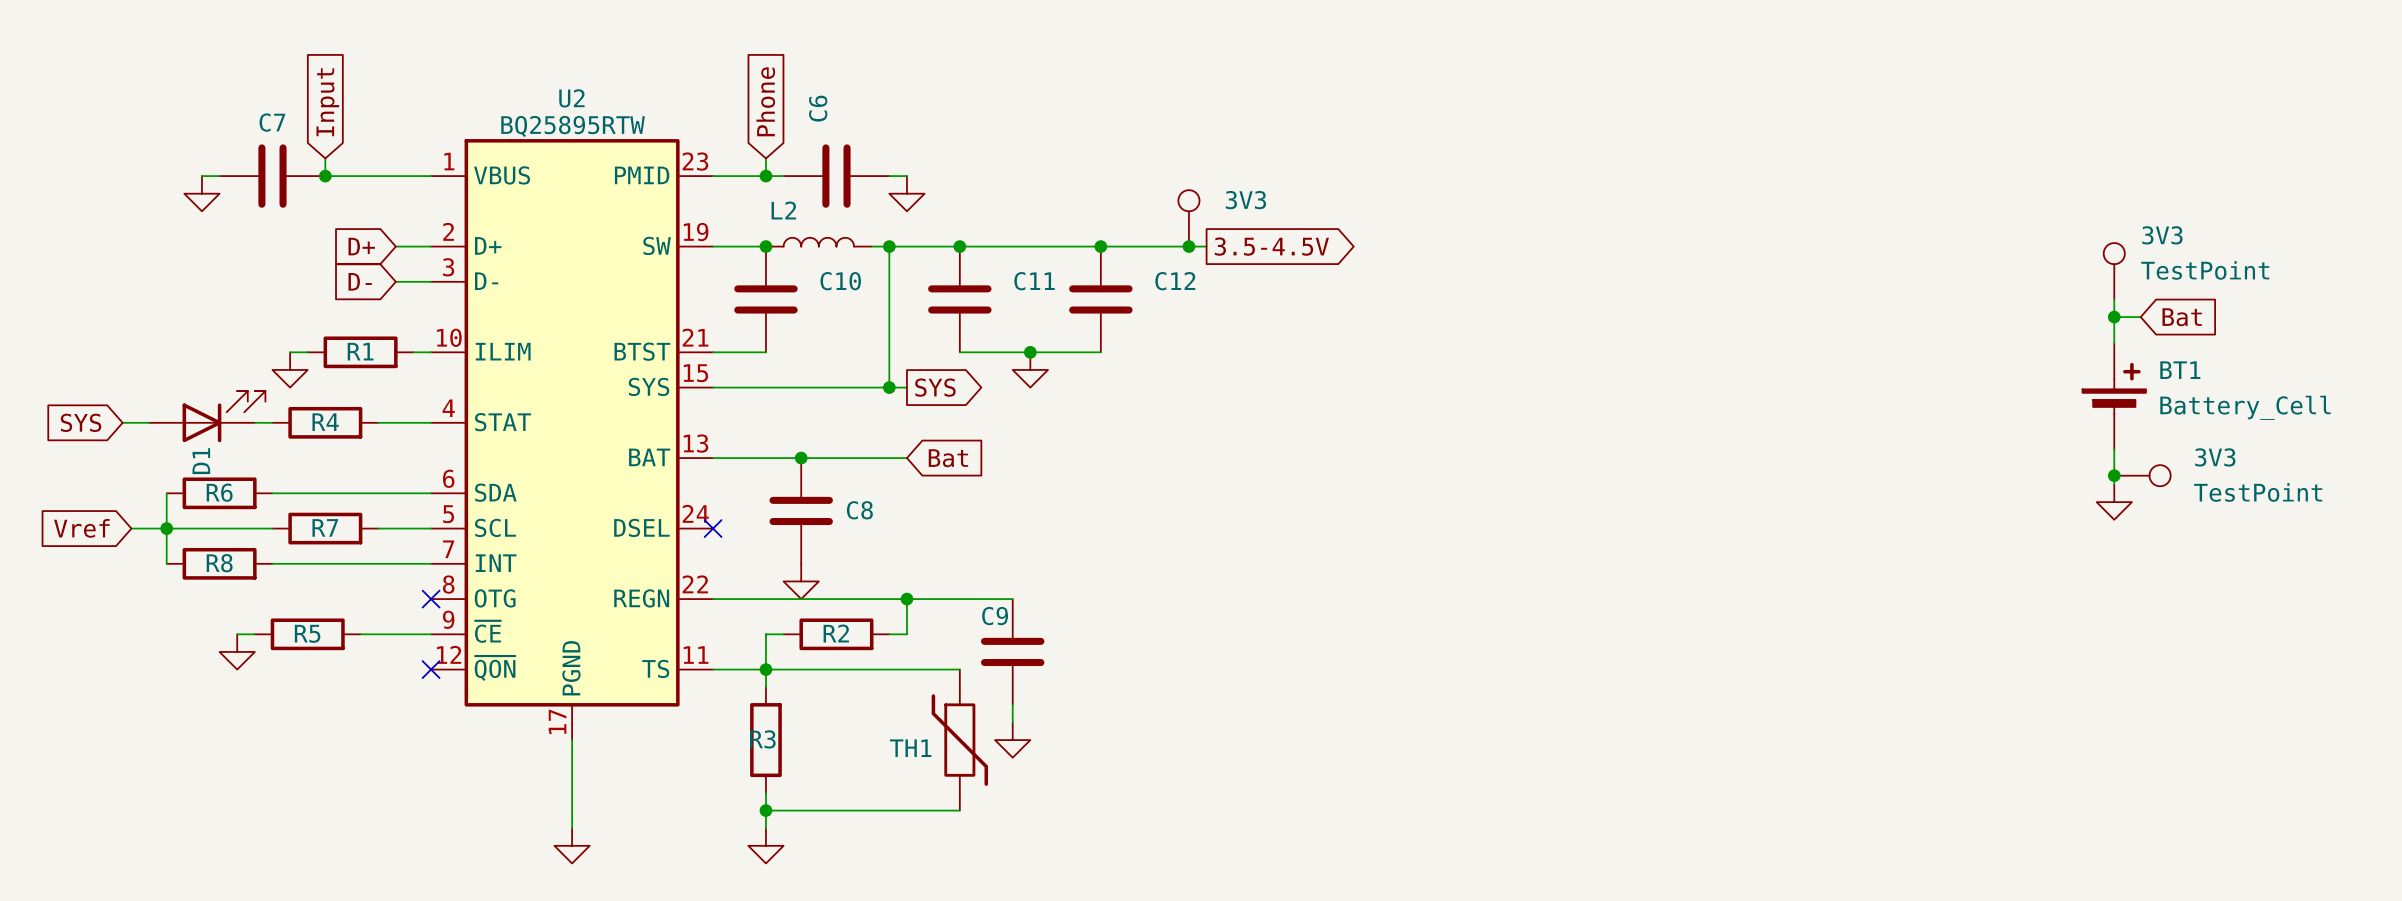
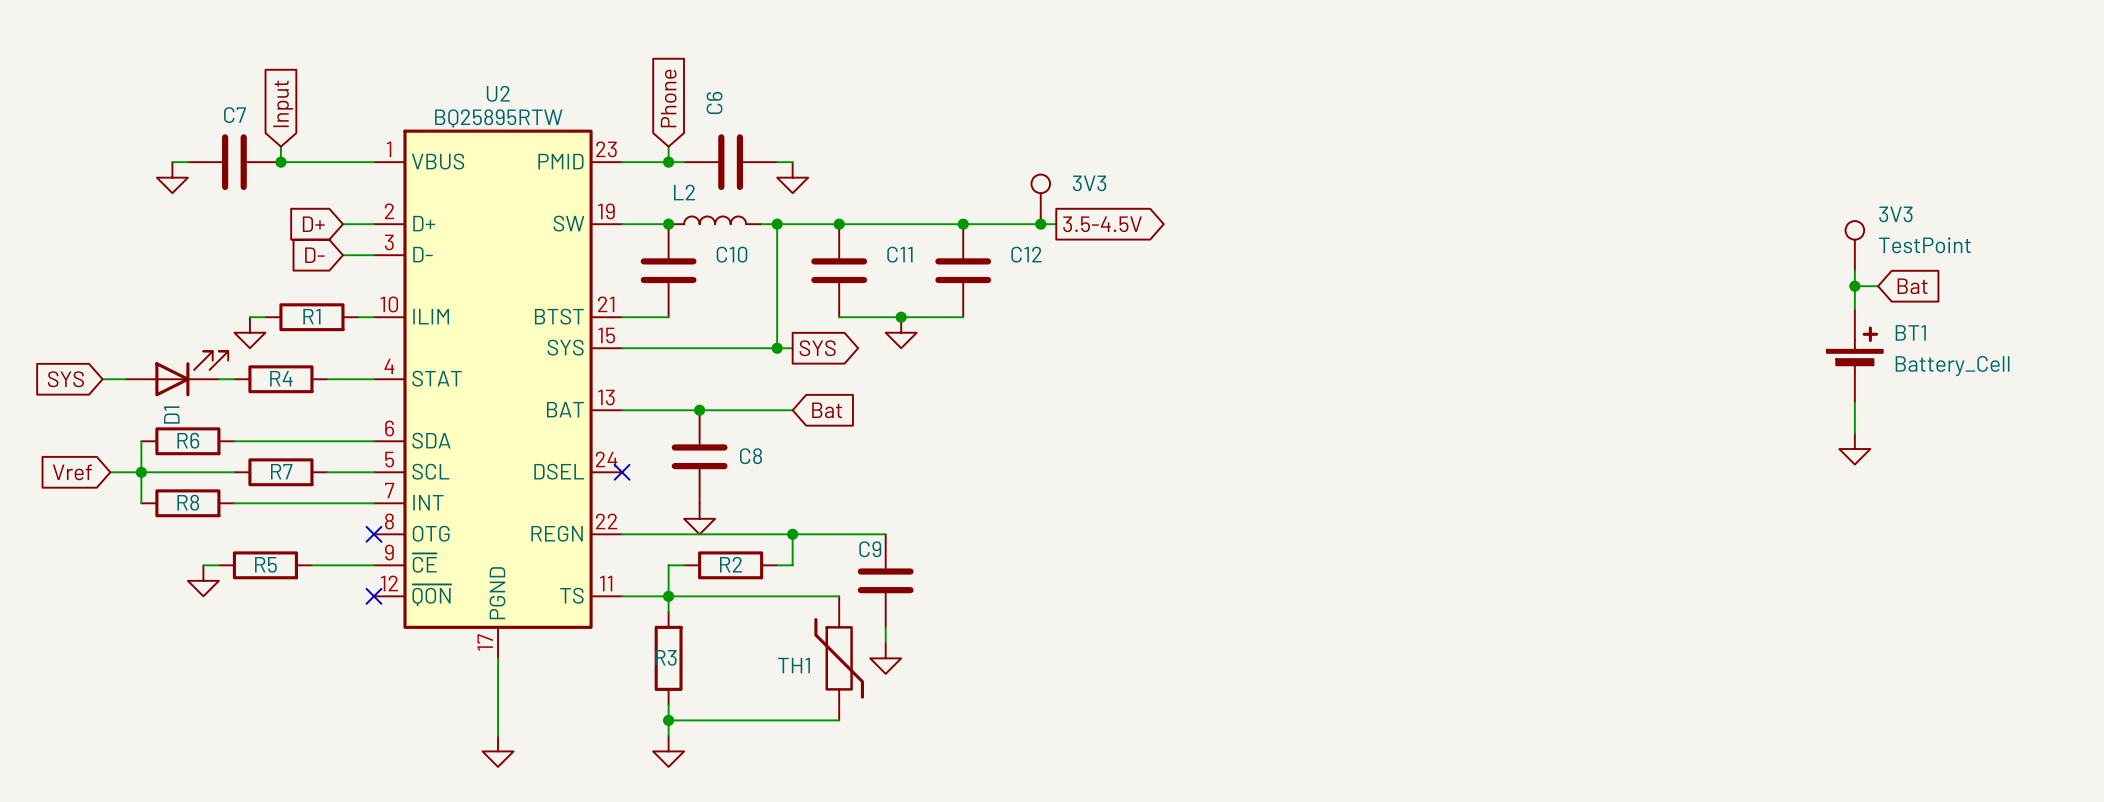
junction: (2114, 475) -> none
3V3: TestPoint (2142, 475) -> none

